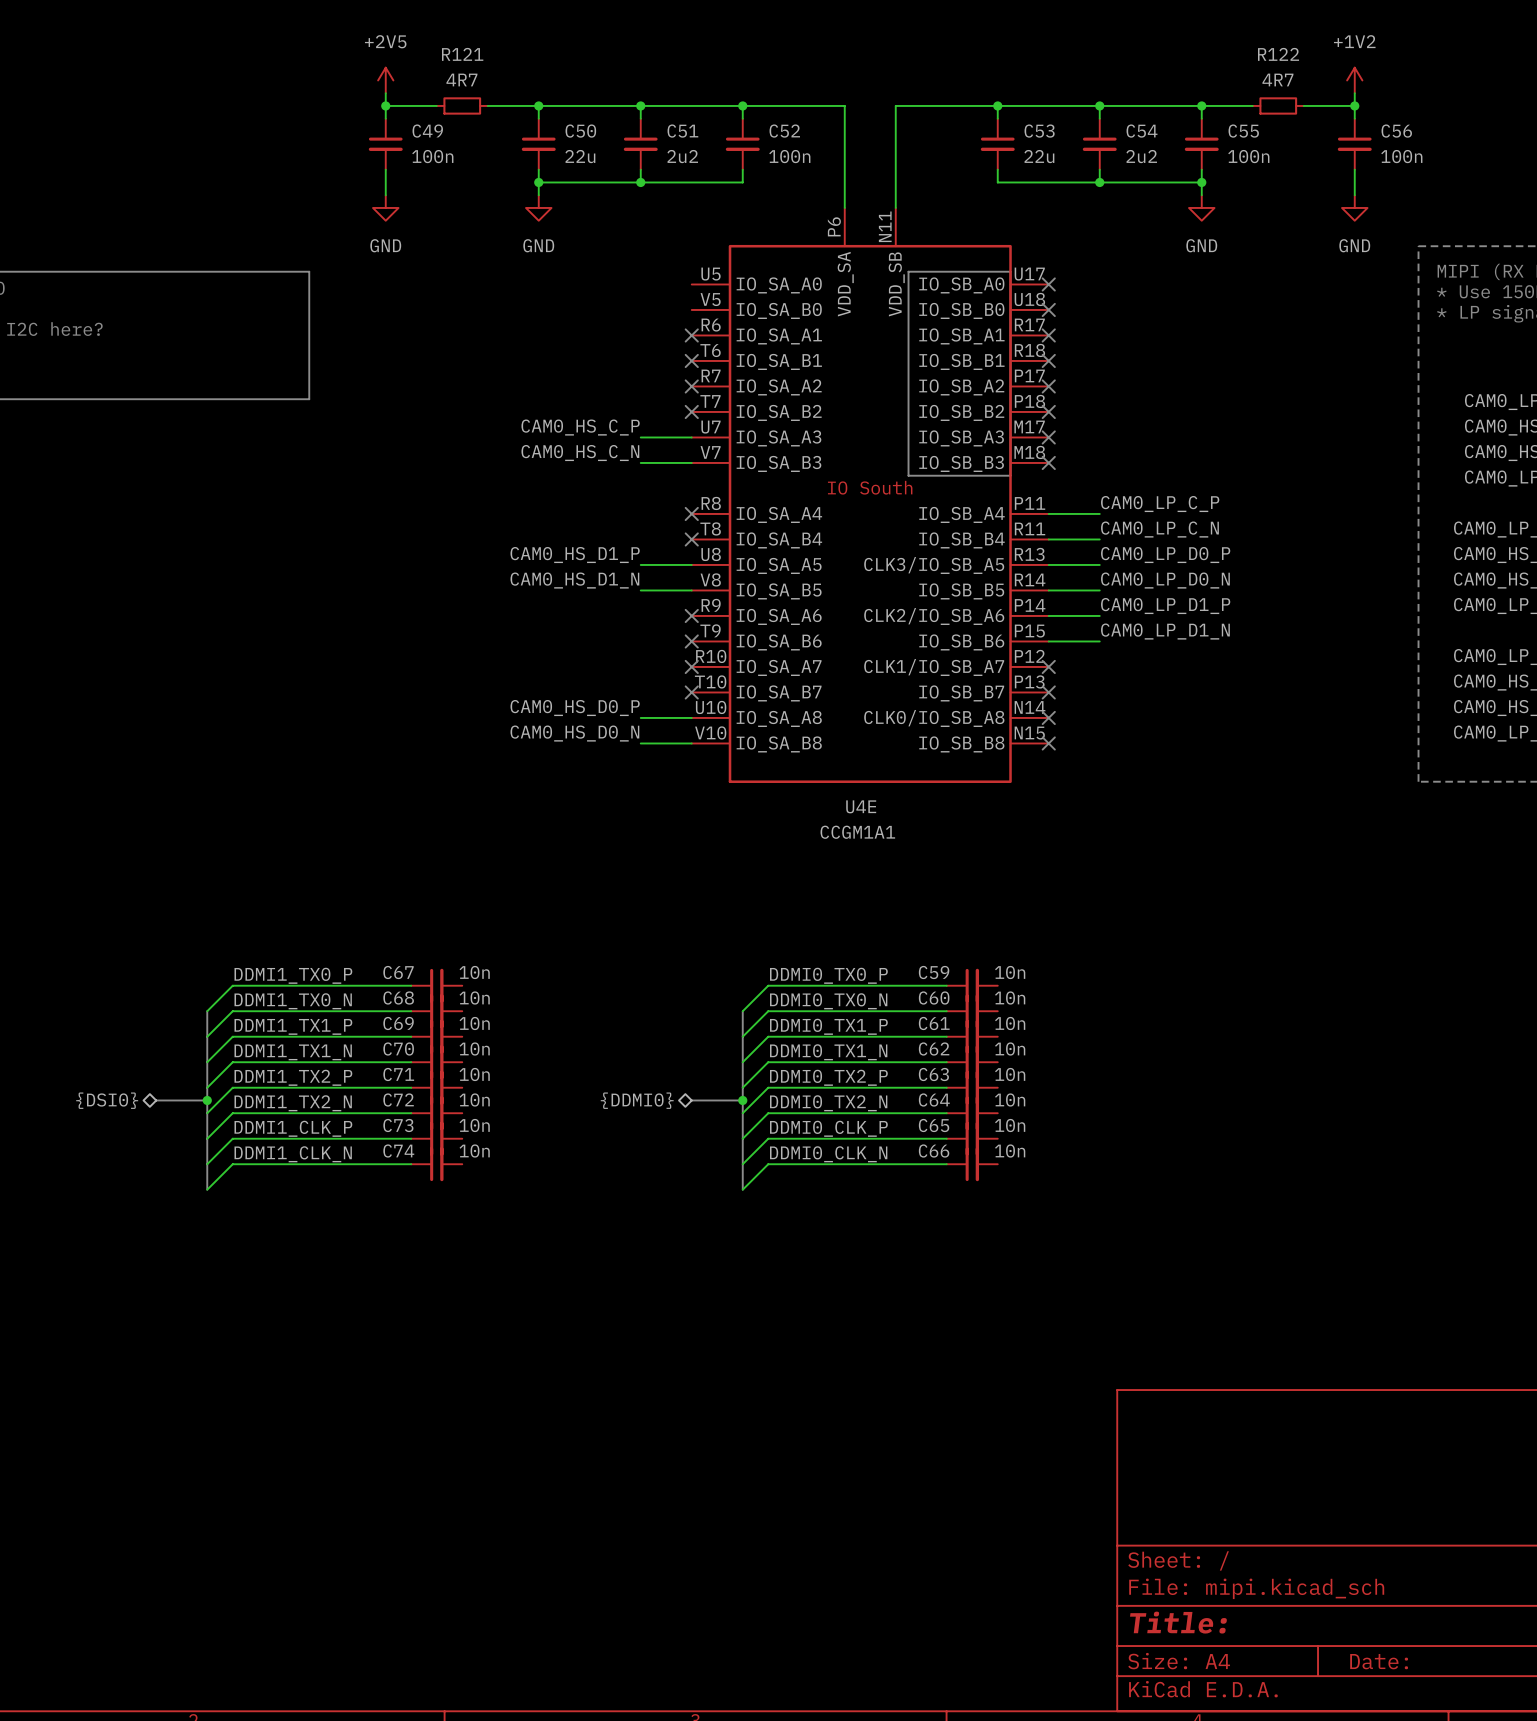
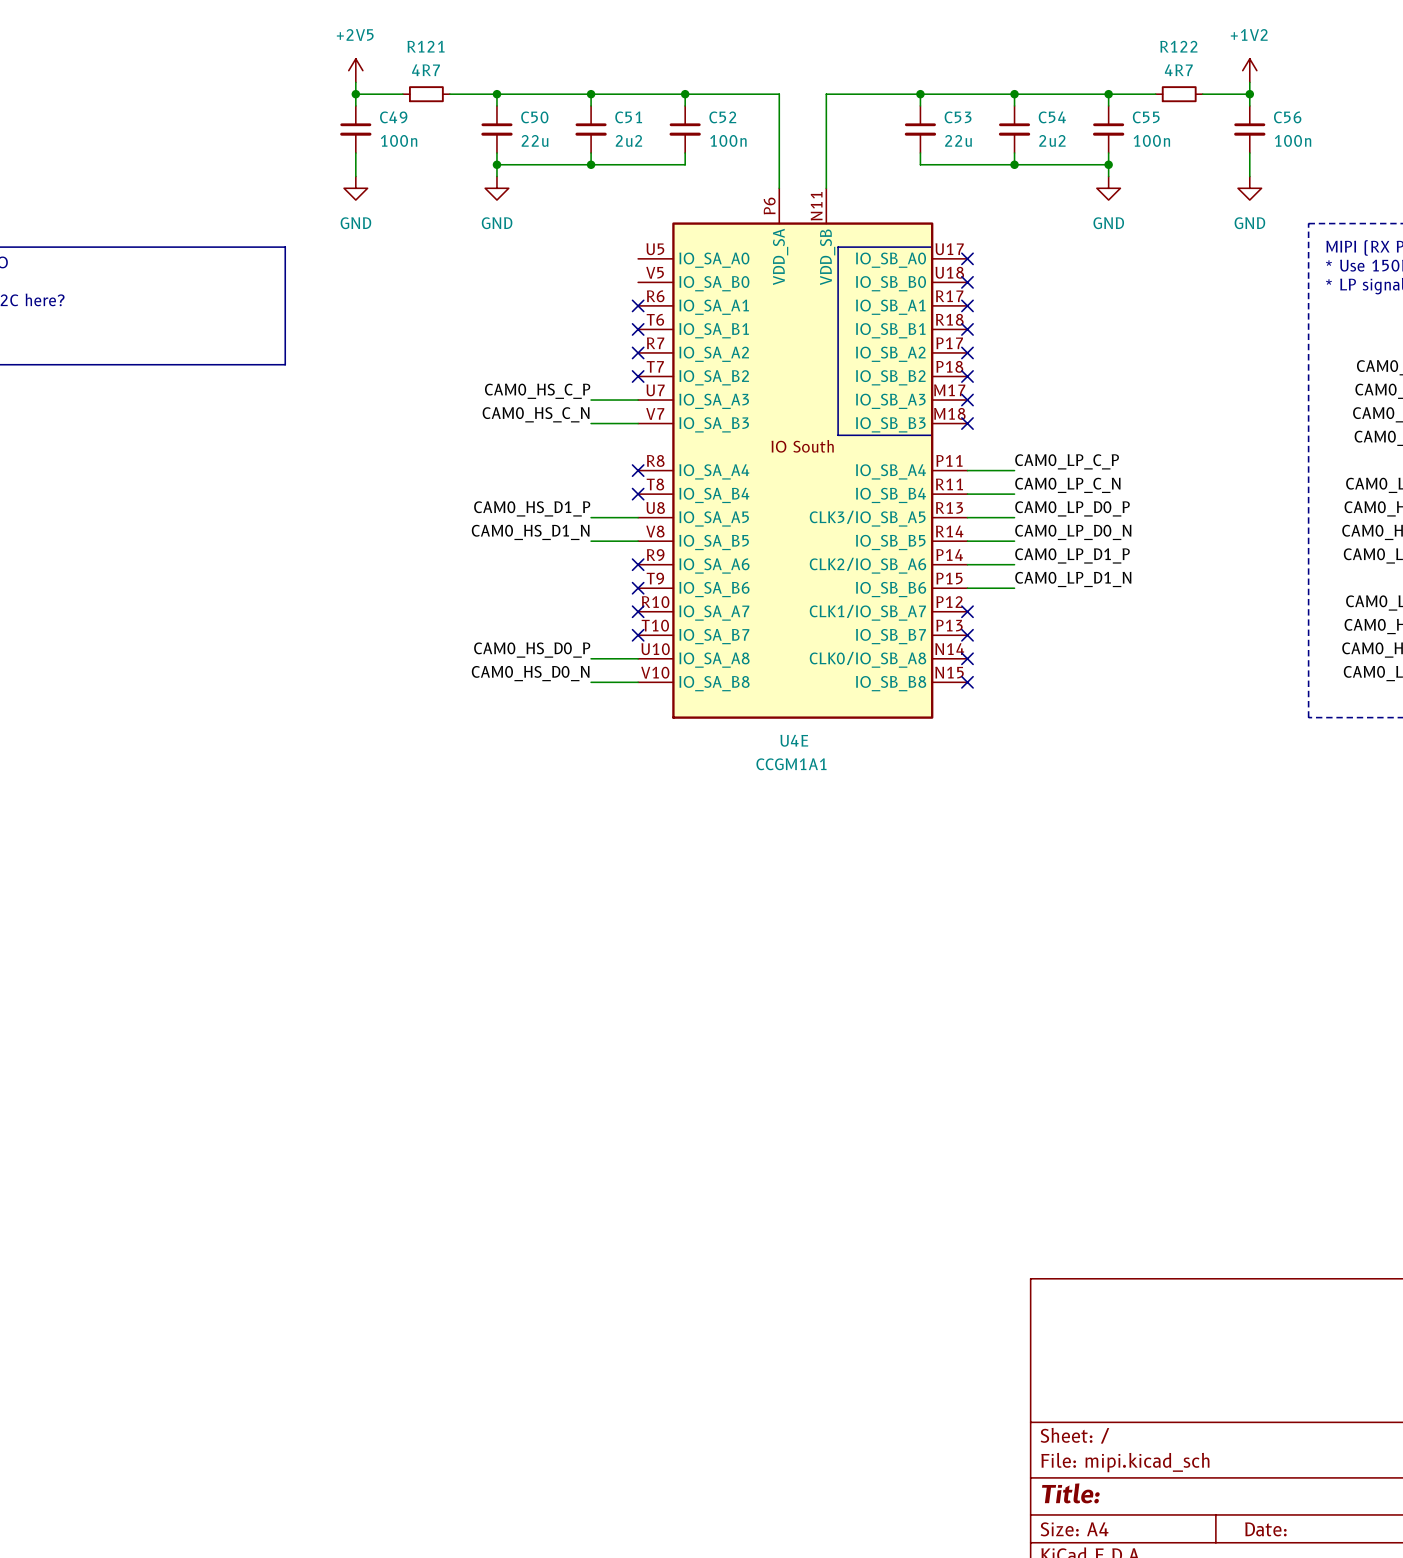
label: DDMI1_TX0_P (293, 975) -> none
label: DDMI0_TX0_P (828, 975) -> none
wire: (411, 985) (232, 985) (207, 1011) -> none
C67: 10n (436, 985) -> none
wire: (946, 985) (768, 985) (742, 1011) -> none
C59: 10n (972, 985) -> none
label: DDMI1_TX0_N (293, 1001) -> none
label: DDMI0_TX0_N (828, 1001) -> none
bus: (207, 1011) (207, 1189) -> none
wire: (411, 1011) (232, 1011) (207, 1036) -> none
C68: 10n (436, 1011) -> none
bus: (742, 1011) (742, 1189) -> none
wire: (946, 1011) (768, 1011) (742, 1036) -> none
C60: 10n (972, 1011) -> none
label: DDMI1_TX1_P (293, 1026) -> none
label: DDMI0_TX1_P (828, 1026) -> none
wire: (411, 1036) (232, 1036) (207, 1062) -> none
C69: 10n (436, 1036) -> none
wire: (946, 1036) (768, 1036) (742, 1062) -> none
C61: 10n (972, 1036) -> none
label: DDMI1_TX1_N (293, 1052) -> none
label: DDMI0_TX1_N (828, 1052) -> none
wire: (411, 1062) (232, 1062) (207, 1087) -> none
C70: 10n (436, 1062) -> none
wire: (946, 1062) (768, 1062) (742, 1087) -> none
C62: 10n (972, 1062) -> none
label: DDMI1_TX2_P (293, 1077) -> none
label: DDMI0_TX2_P (828, 1077) -> none
wire: (411, 1087) (232, 1087) (207, 1113) -> none
C71: 10n (436, 1087) -> none
wire: (946, 1087) (768, 1087) (742, 1113) -> none
C63: 10n (972, 1087) -> none
hierarchical label: {DSI0} (107, 1100) -> none
bus: (156, 1100) (207, 1100) -> none
junction: (207, 1100) -> none
hierarchical label: {DDMI0} (637, 1100) -> none
bus: (691, 1100) (742, 1100) -> none
junction: (742, 1100) -> none
label: DDMI1_TX2_N (293, 1103) -> none
label: DDMI0_TX2_N (828, 1103) -> none
wire: (411, 1113) (232, 1113) (207, 1138) -> none
C72: 10n (436, 1113) -> none
wire: (946, 1113) (768, 1113) (742, 1138) -> none
C64: 10n (972, 1113) -> none
label: DDMI1_CLK_P (293, 1128) -> none
label: DDMI0_CLK_P (828, 1128) -> none
wire: (411, 1138) (232, 1138) (207, 1164) -> none
C73: 10n (436, 1138) -> none
wire: (946, 1138) (768, 1138) (742, 1164) -> none
C65: 10n (972, 1138) -> none
label: DDMI1_CLK_N (293, 1154) -> none
label: DDMI0_CLK_N (828, 1154) -> none
wire: (411, 1164) (232, 1164) (207, 1189) -> none
C74: 10n (436, 1164) -> none
wire: (946, 1164) (768, 1164) (742, 1189) -> none
C66: 10n (972, 1164) -> none

